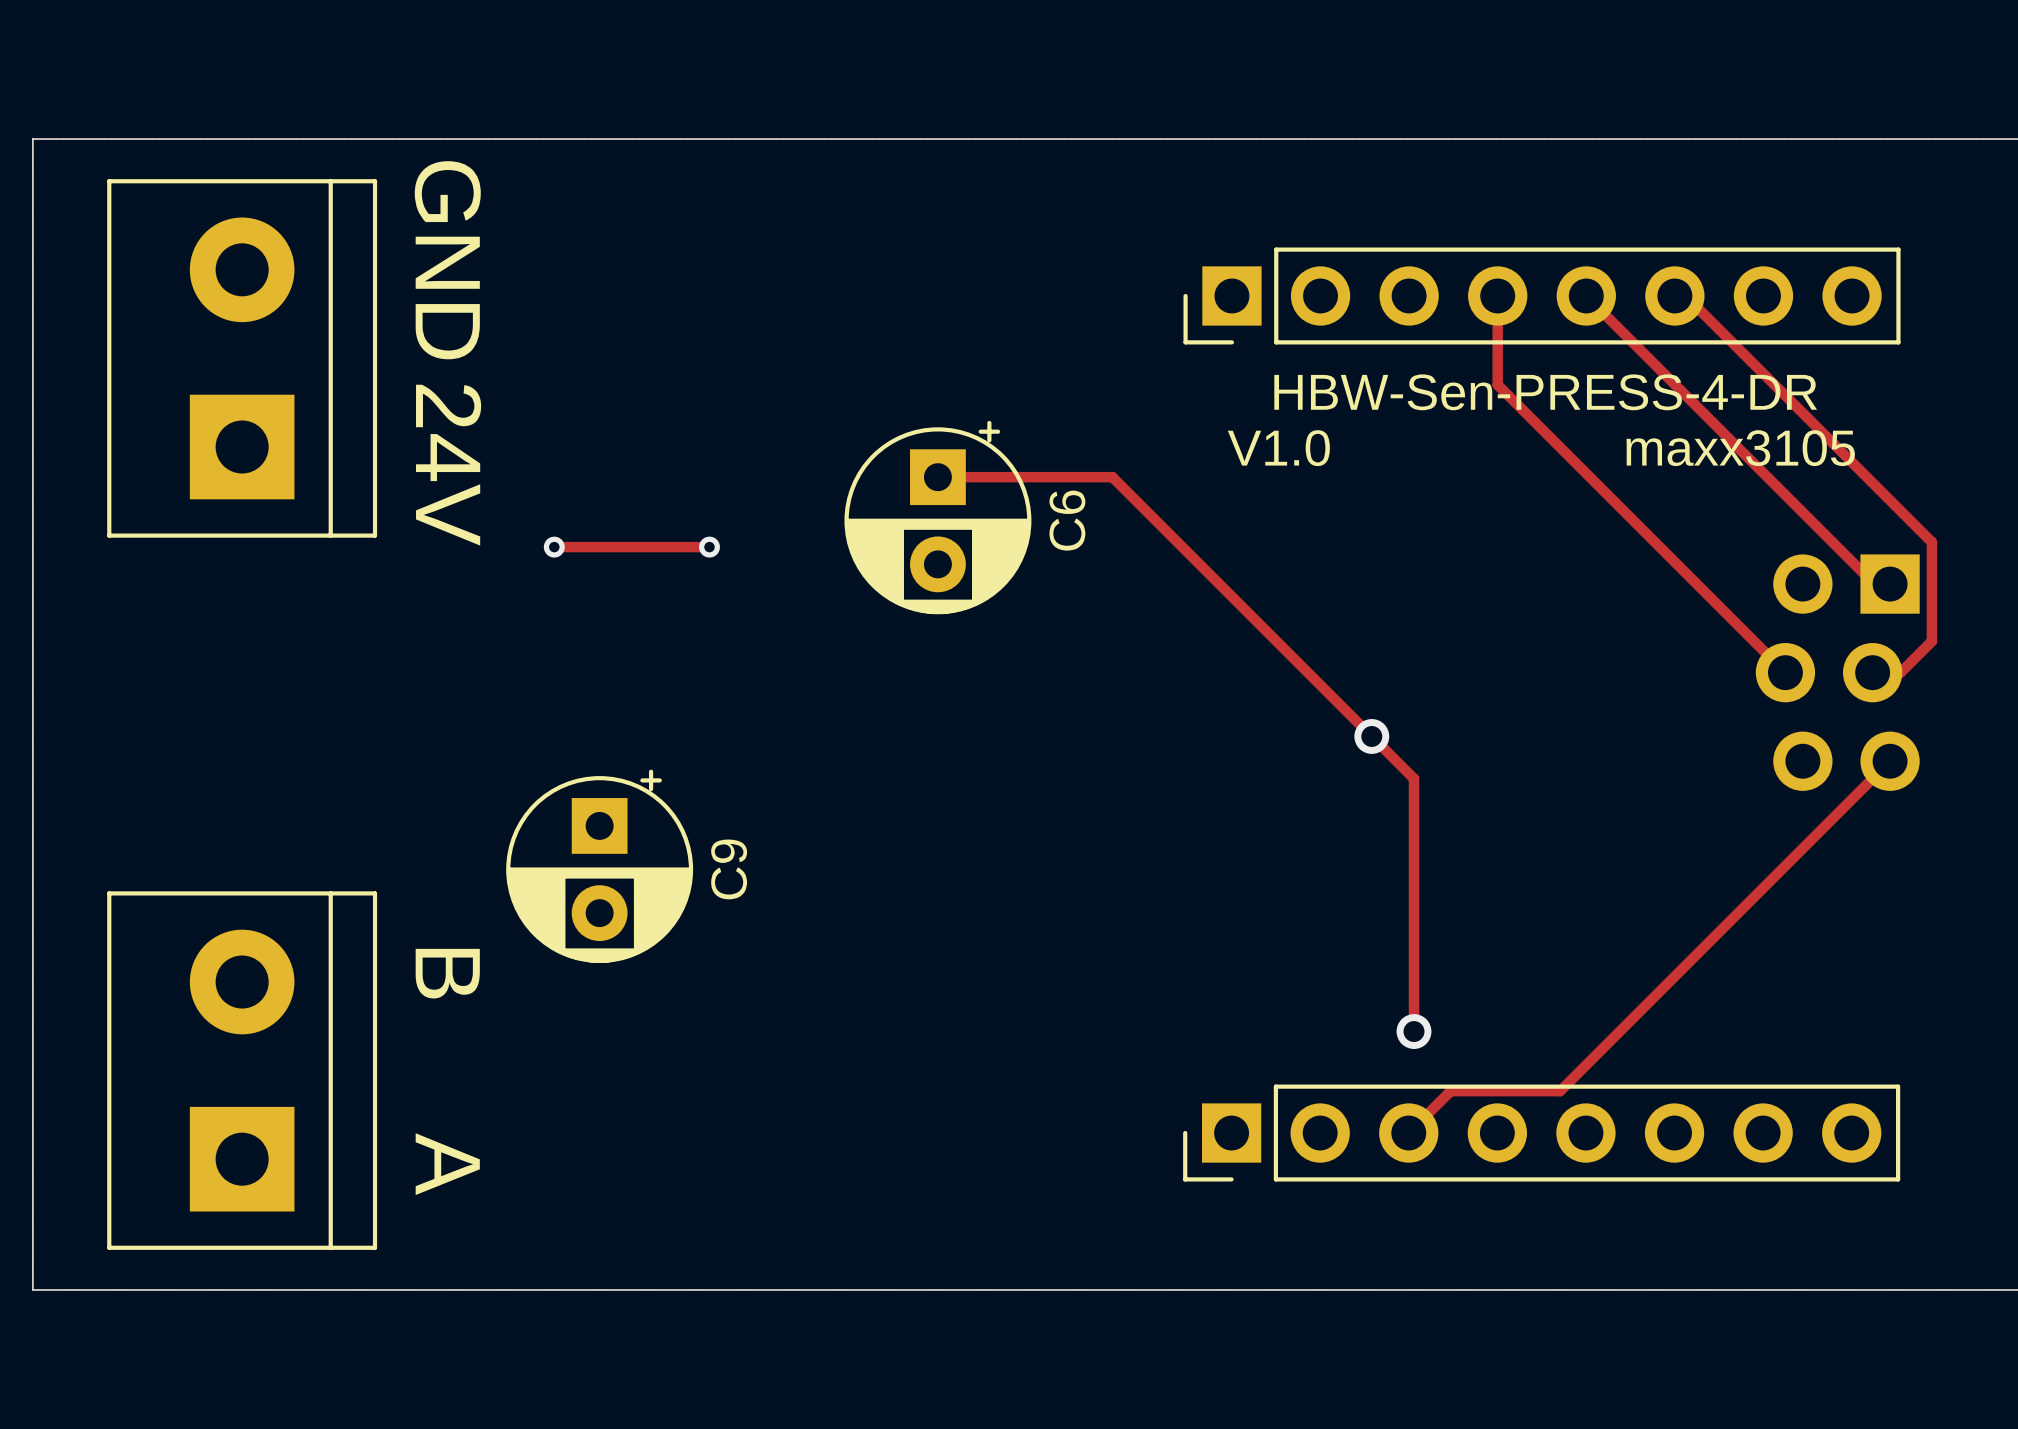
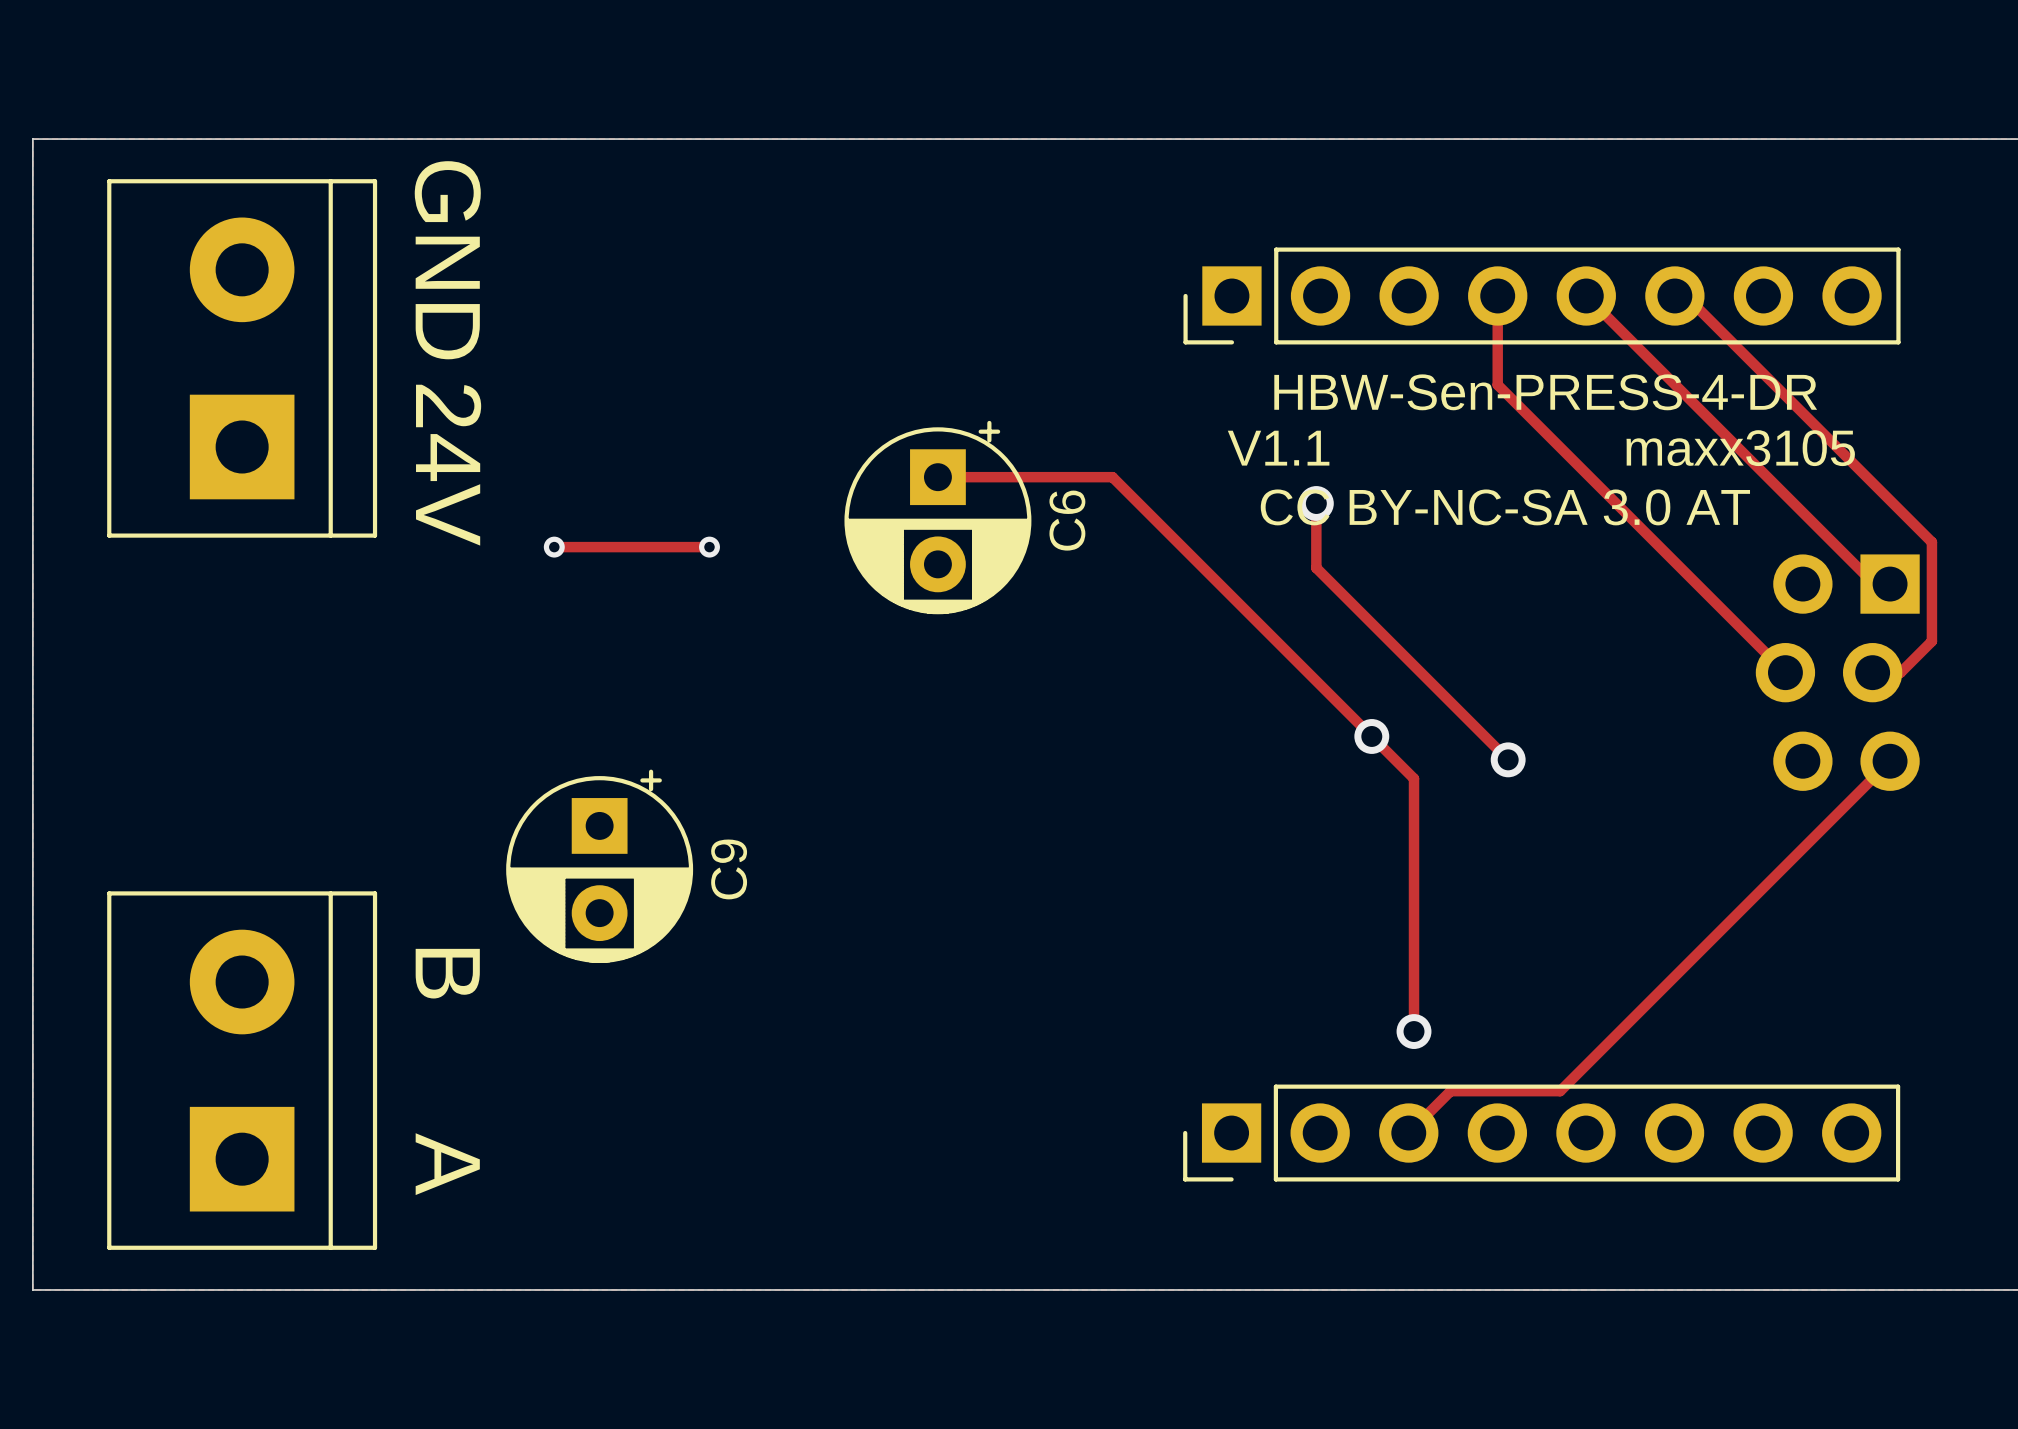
text: V1.0 (1278, 448) -> V1.1 (1278, 448)
track: none -> (1316, 503) (1316, 568) (1508, 759)
via: none -> (1316, 503)
text: none -> CC BY-NC-SA 3.0 AT (1505, 507)
via: none -> (1508, 759)

